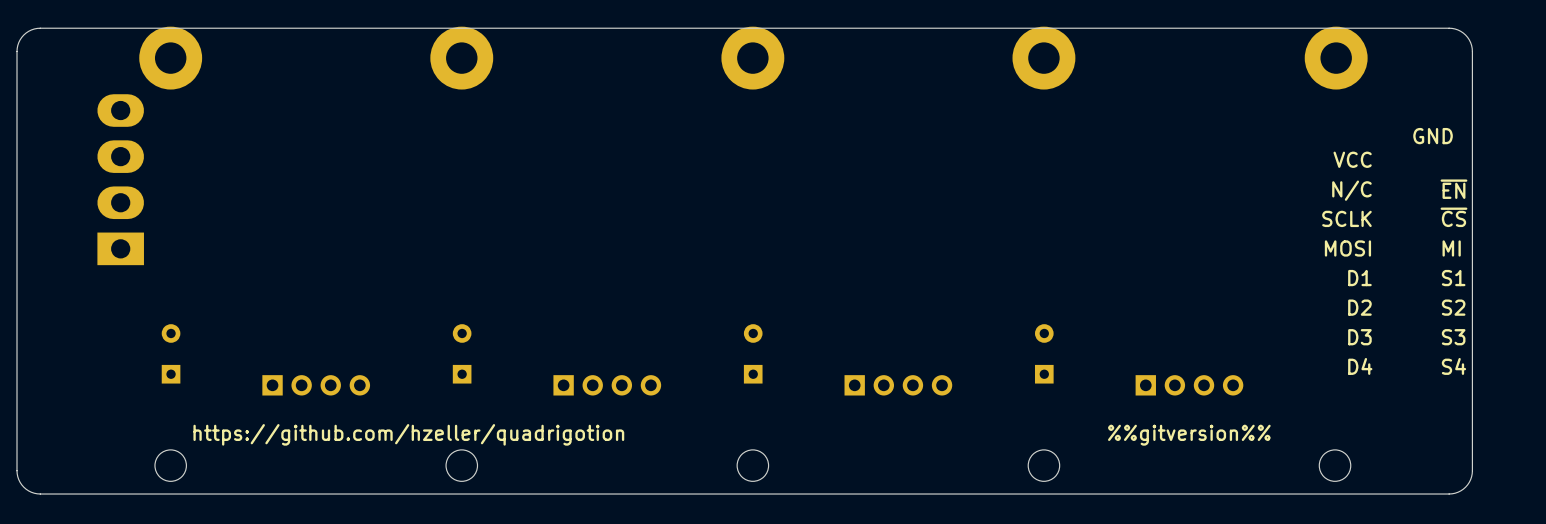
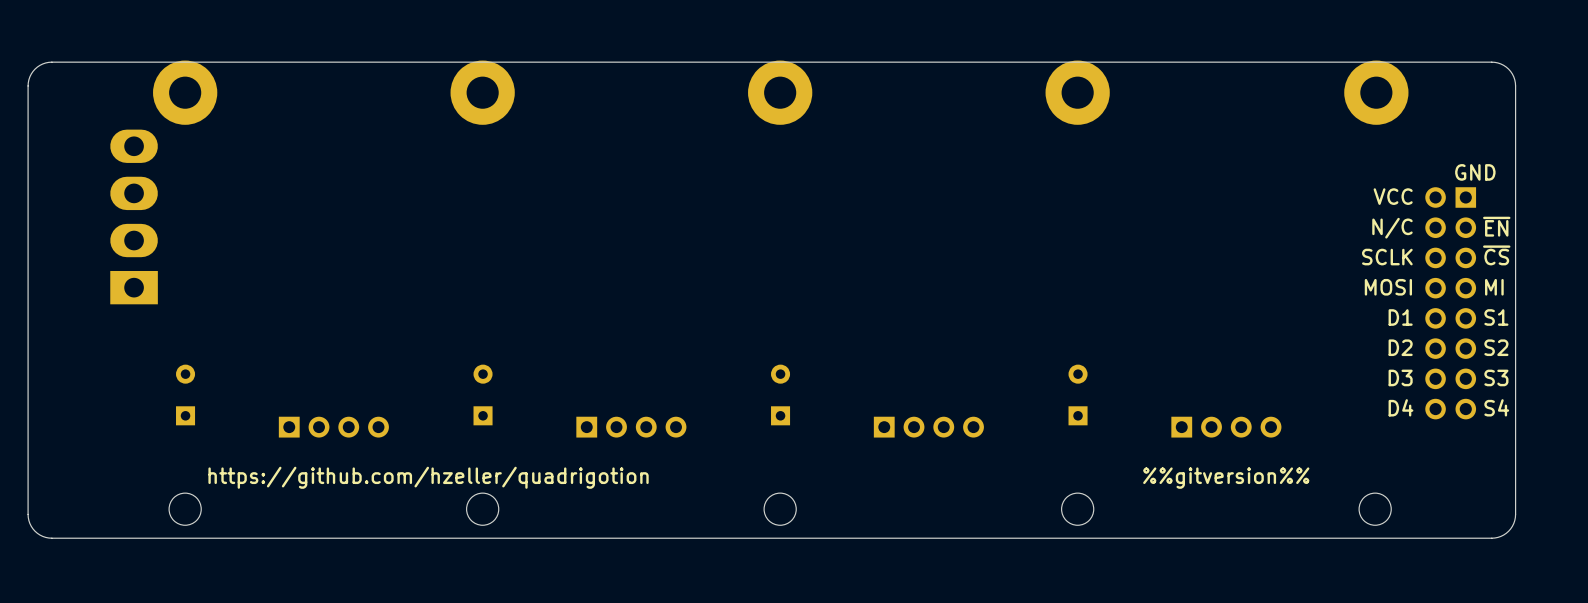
part: none -> (1450, 303)

